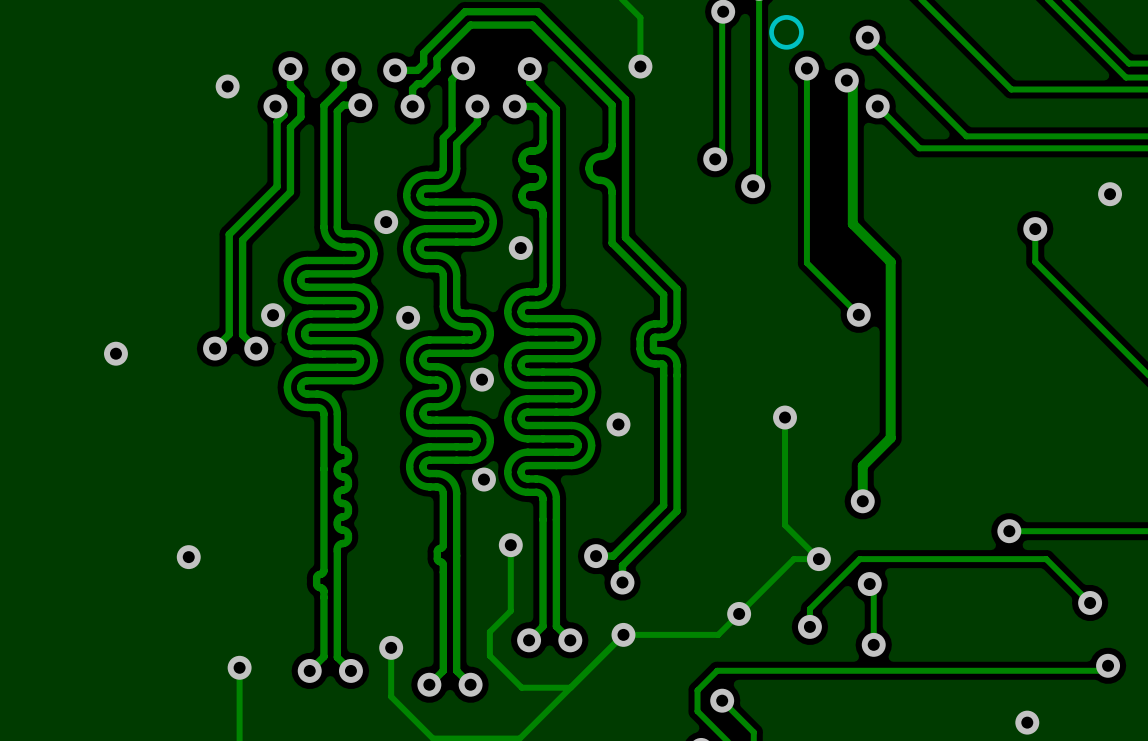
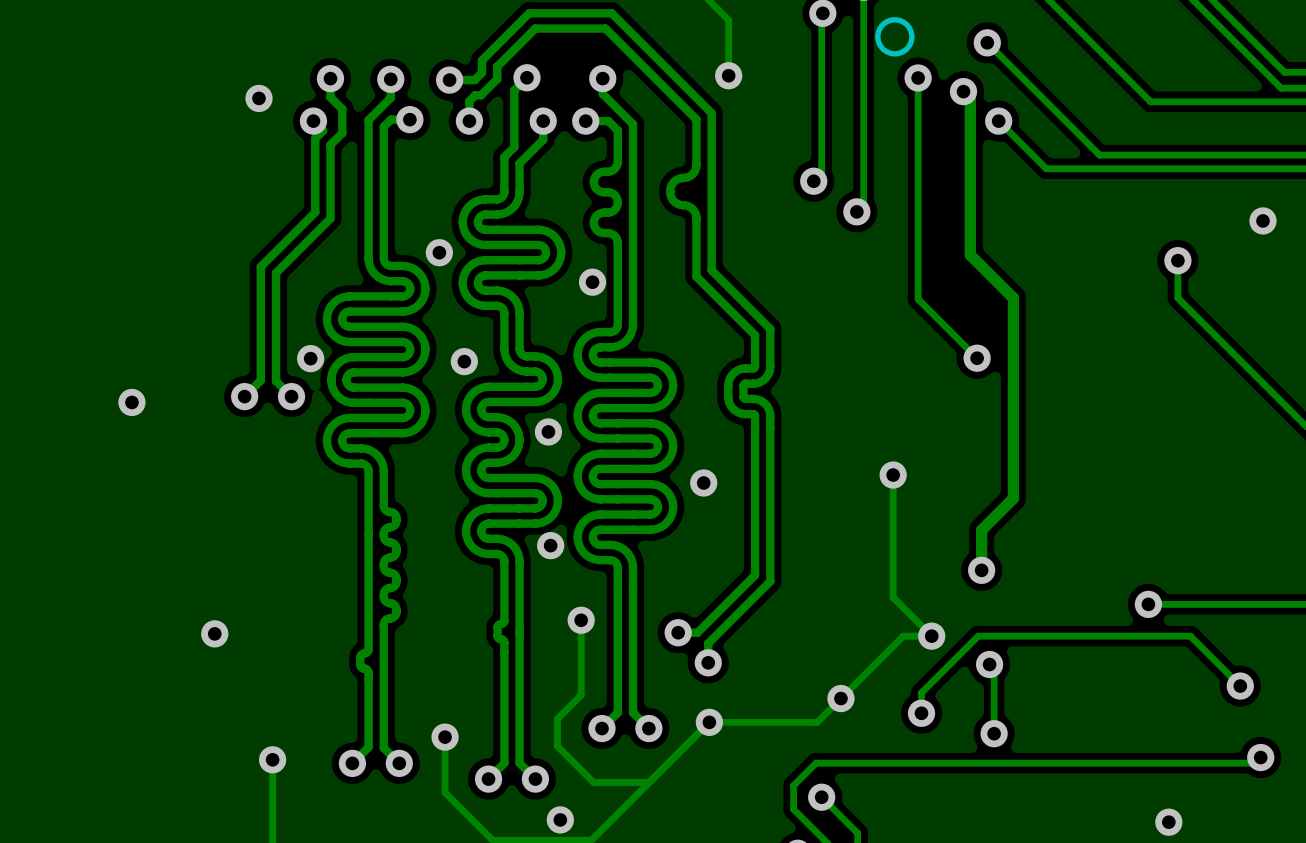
via: none -> (560, 819)

